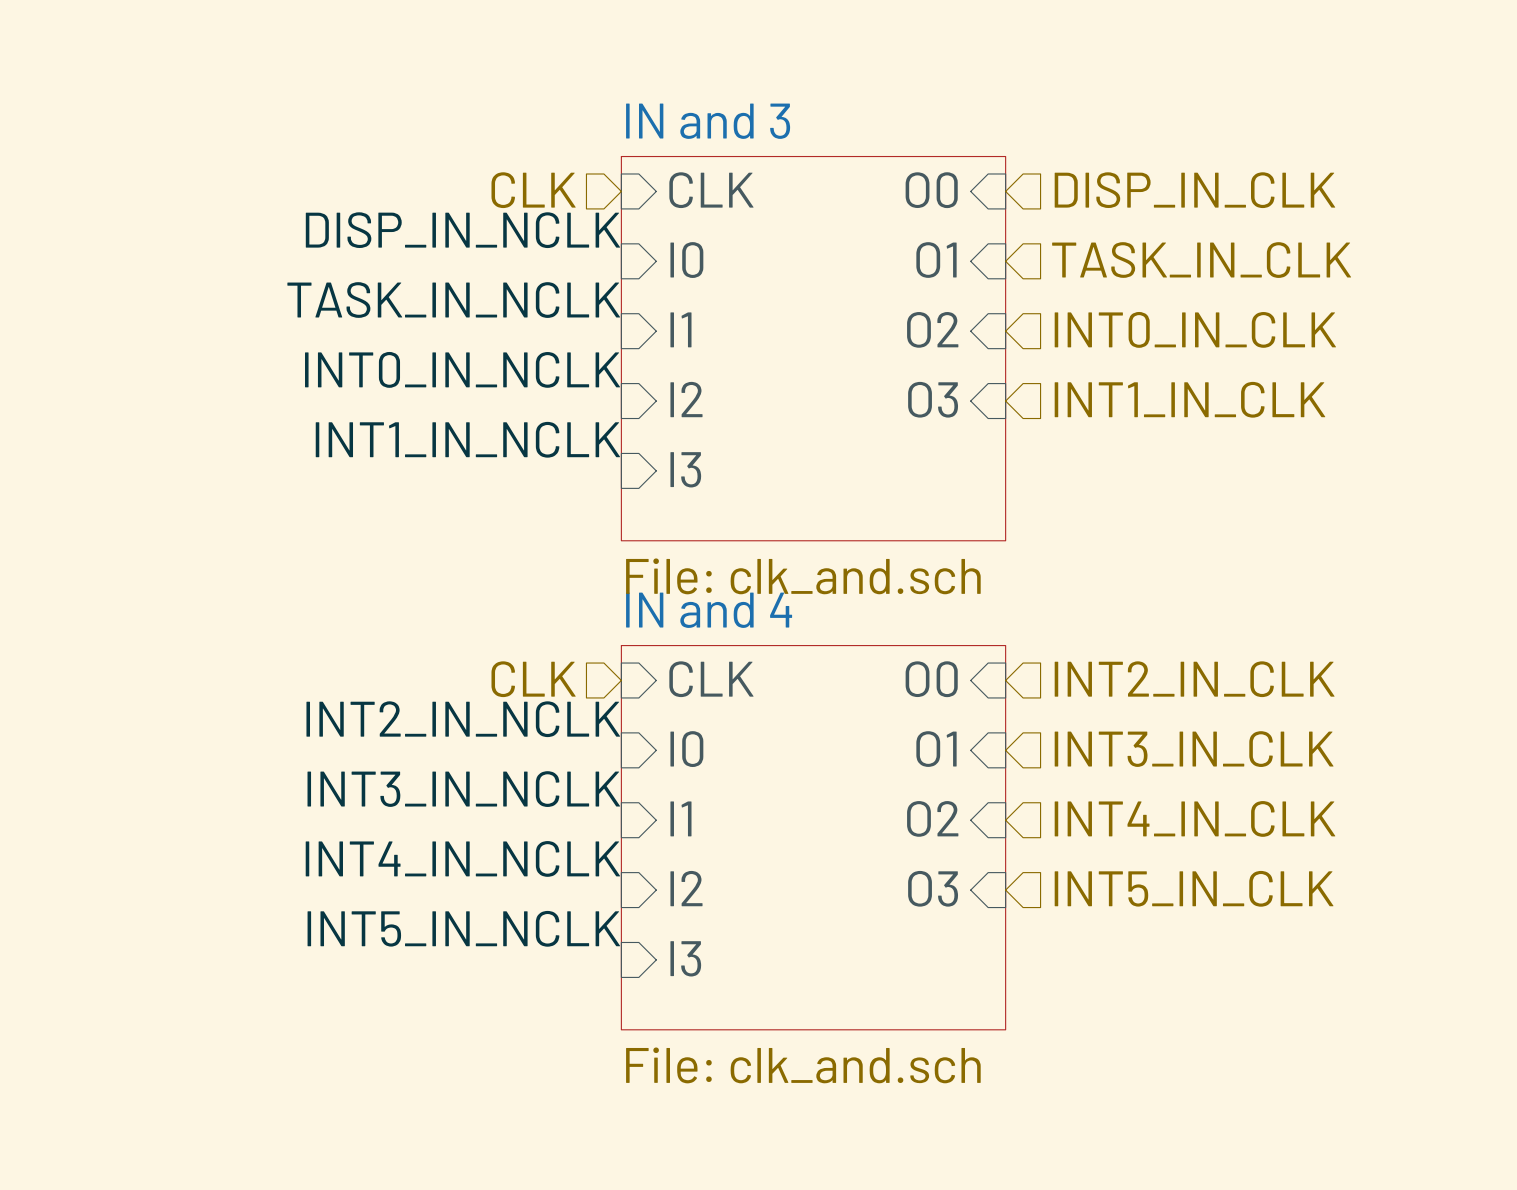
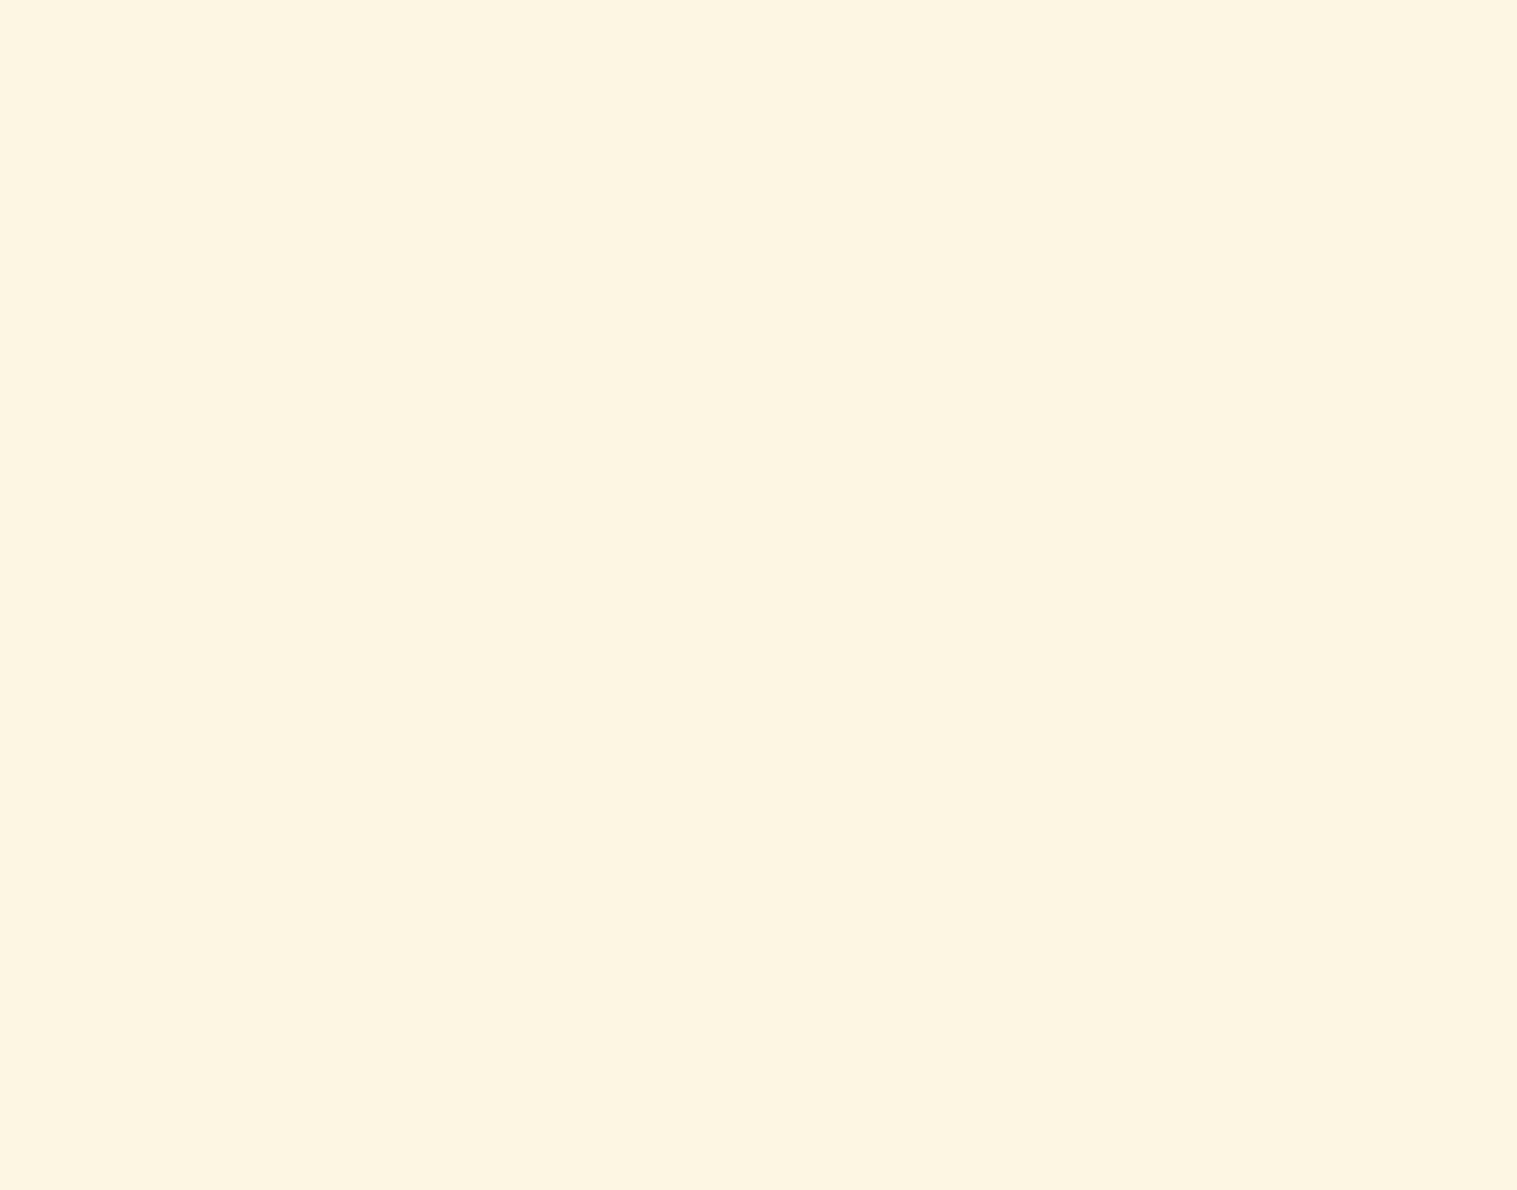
hierarchical label: CLK (533, 190) -> none
sheet pin: CLK (711, 190) -> none
sheet pin: O0 (931, 190) -> none
hierarchical label: DISP_IN_CLK (1194, 190) -> none
label: DISP_IN_NCLK (462, 230) -> none
sheet pin: I0 (686, 260) -> none
sheet pin: O1 (936, 260) -> none
hierarchical label: TASK_IN_CLK (1201, 260) -> none
label: TASK_IN_NCLK (453, 300) -> none
sheet pin: I1 (680, 329) -> none
sheet pin: O2 (932, 329) -> none
hierarchical label: INT0_IN_CLK (1195, 329) -> none
sheet IN and 3: File: clk_and.sch (813, 348) -> none
label: INT0_IN_NCLK (462, 369) -> none
sheet pin: I2 (686, 399) -> none
sheet pin: O3 (933, 399) -> none
hierarchical label: INT1_IN_CLK (1189, 399) -> none
label: INT1_IN_NCLK (467, 439) -> none
sheet pin: I3 (685, 469) -> none
hierarchical label: CLK (533, 679) -> none
sheet pin: CLK (711, 679) -> none
sheet pin: O0 (931, 679) -> none
hierarchical label: INT2_IN_CLK (1194, 679) -> none
label: INT2_IN_NCLK (463, 719) -> none
sheet pin: I0 (686, 749) -> none
sheet pin: O1 (936, 749) -> none
hierarchical label: INT3_IN_CLK (1194, 749) -> none
label: INT3_IN_NCLK (463, 789) -> none
sheet pin: I1 (680, 818) -> none
sheet pin: O2 (932, 818) -> none
hierarchical label: INT4_IN_CLK (1194, 818) -> none
sheet IN and 4: File: clk_and.sch (813, 837) -> none
label: INT4_IN_NCLK (462, 858) -> none
sheet pin: I2 (686, 888) -> none
sheet pin: O3 (933, 888) -> none
hierarchical label: INT5_IN_CLK (1194, 888) -> none
label: INT5_IN_NCLK (463, 928) -> none
sheet pin: I3 (685, 958) -> none

